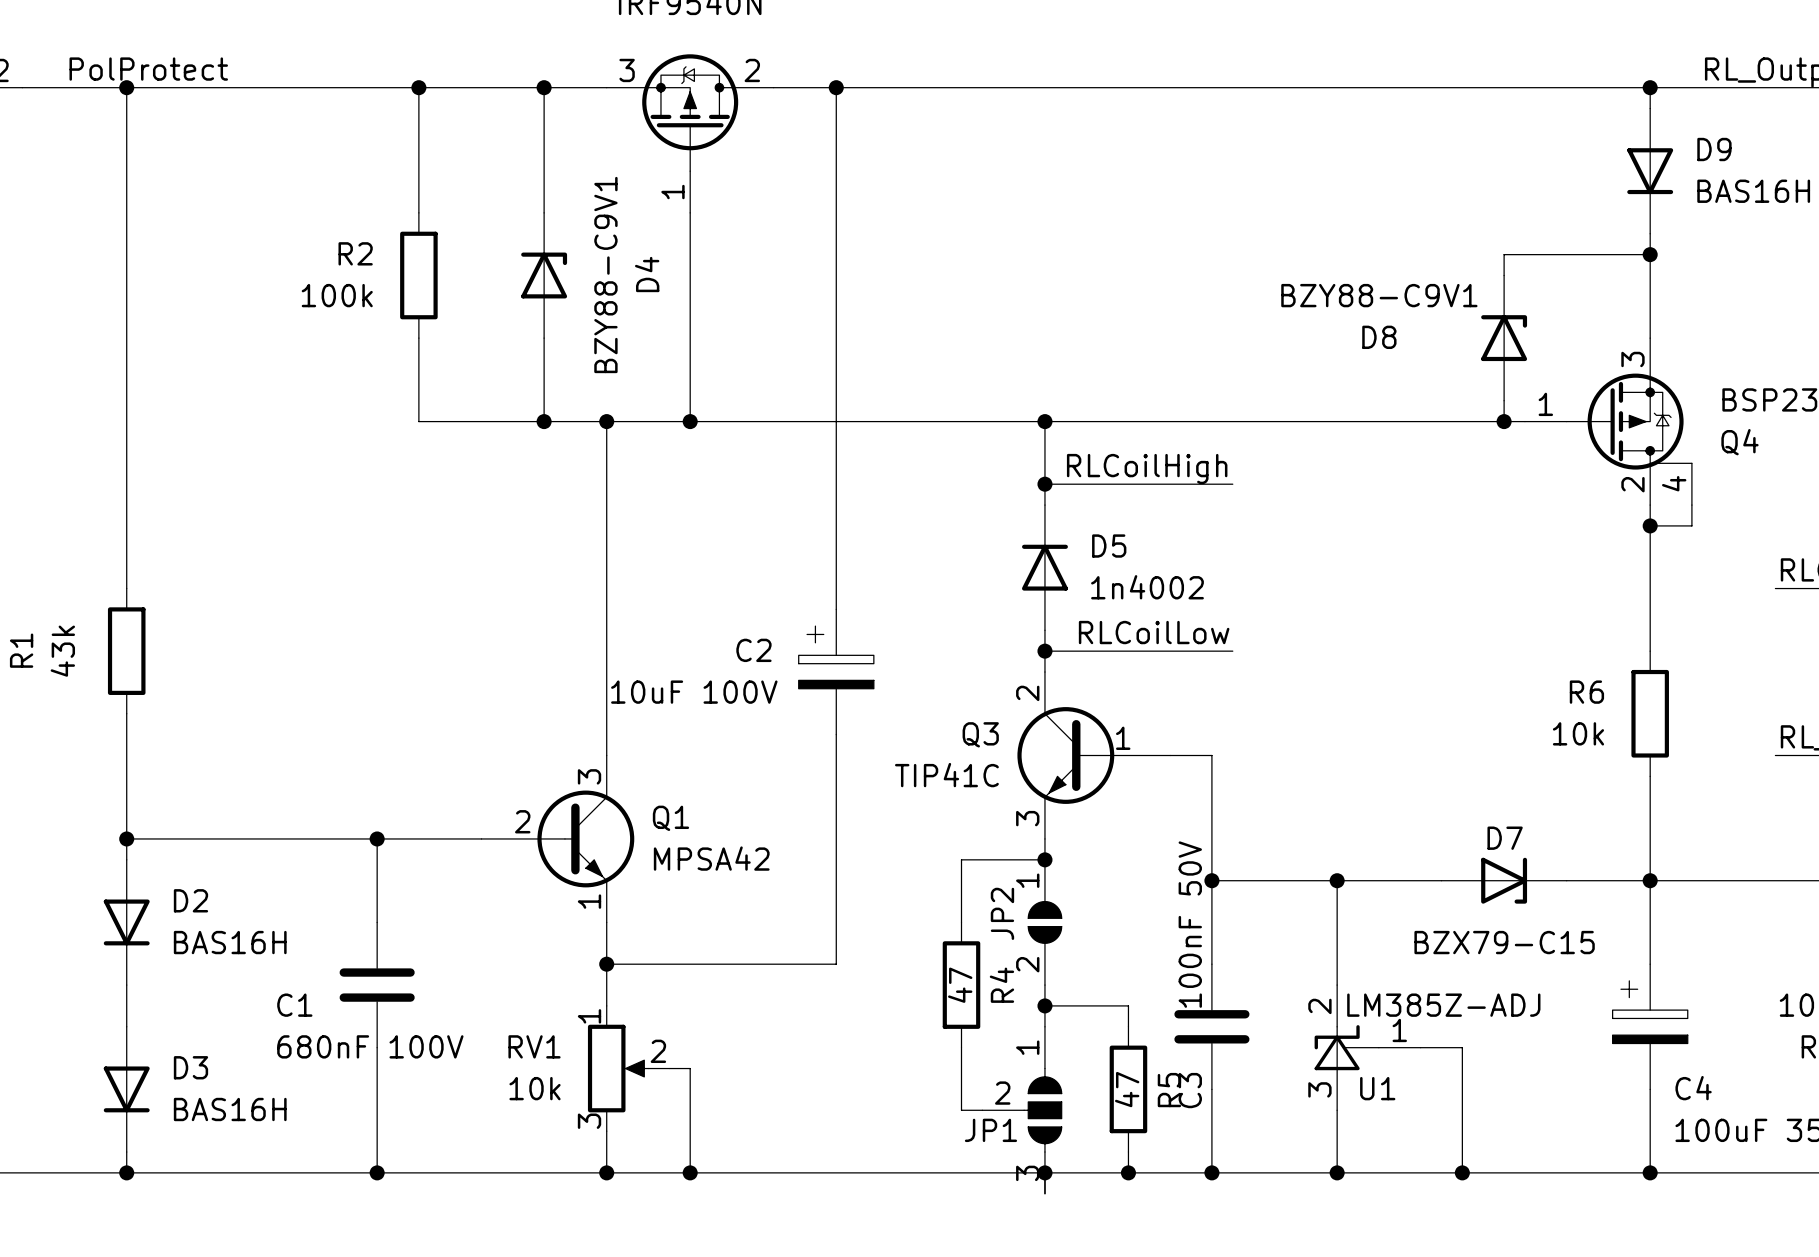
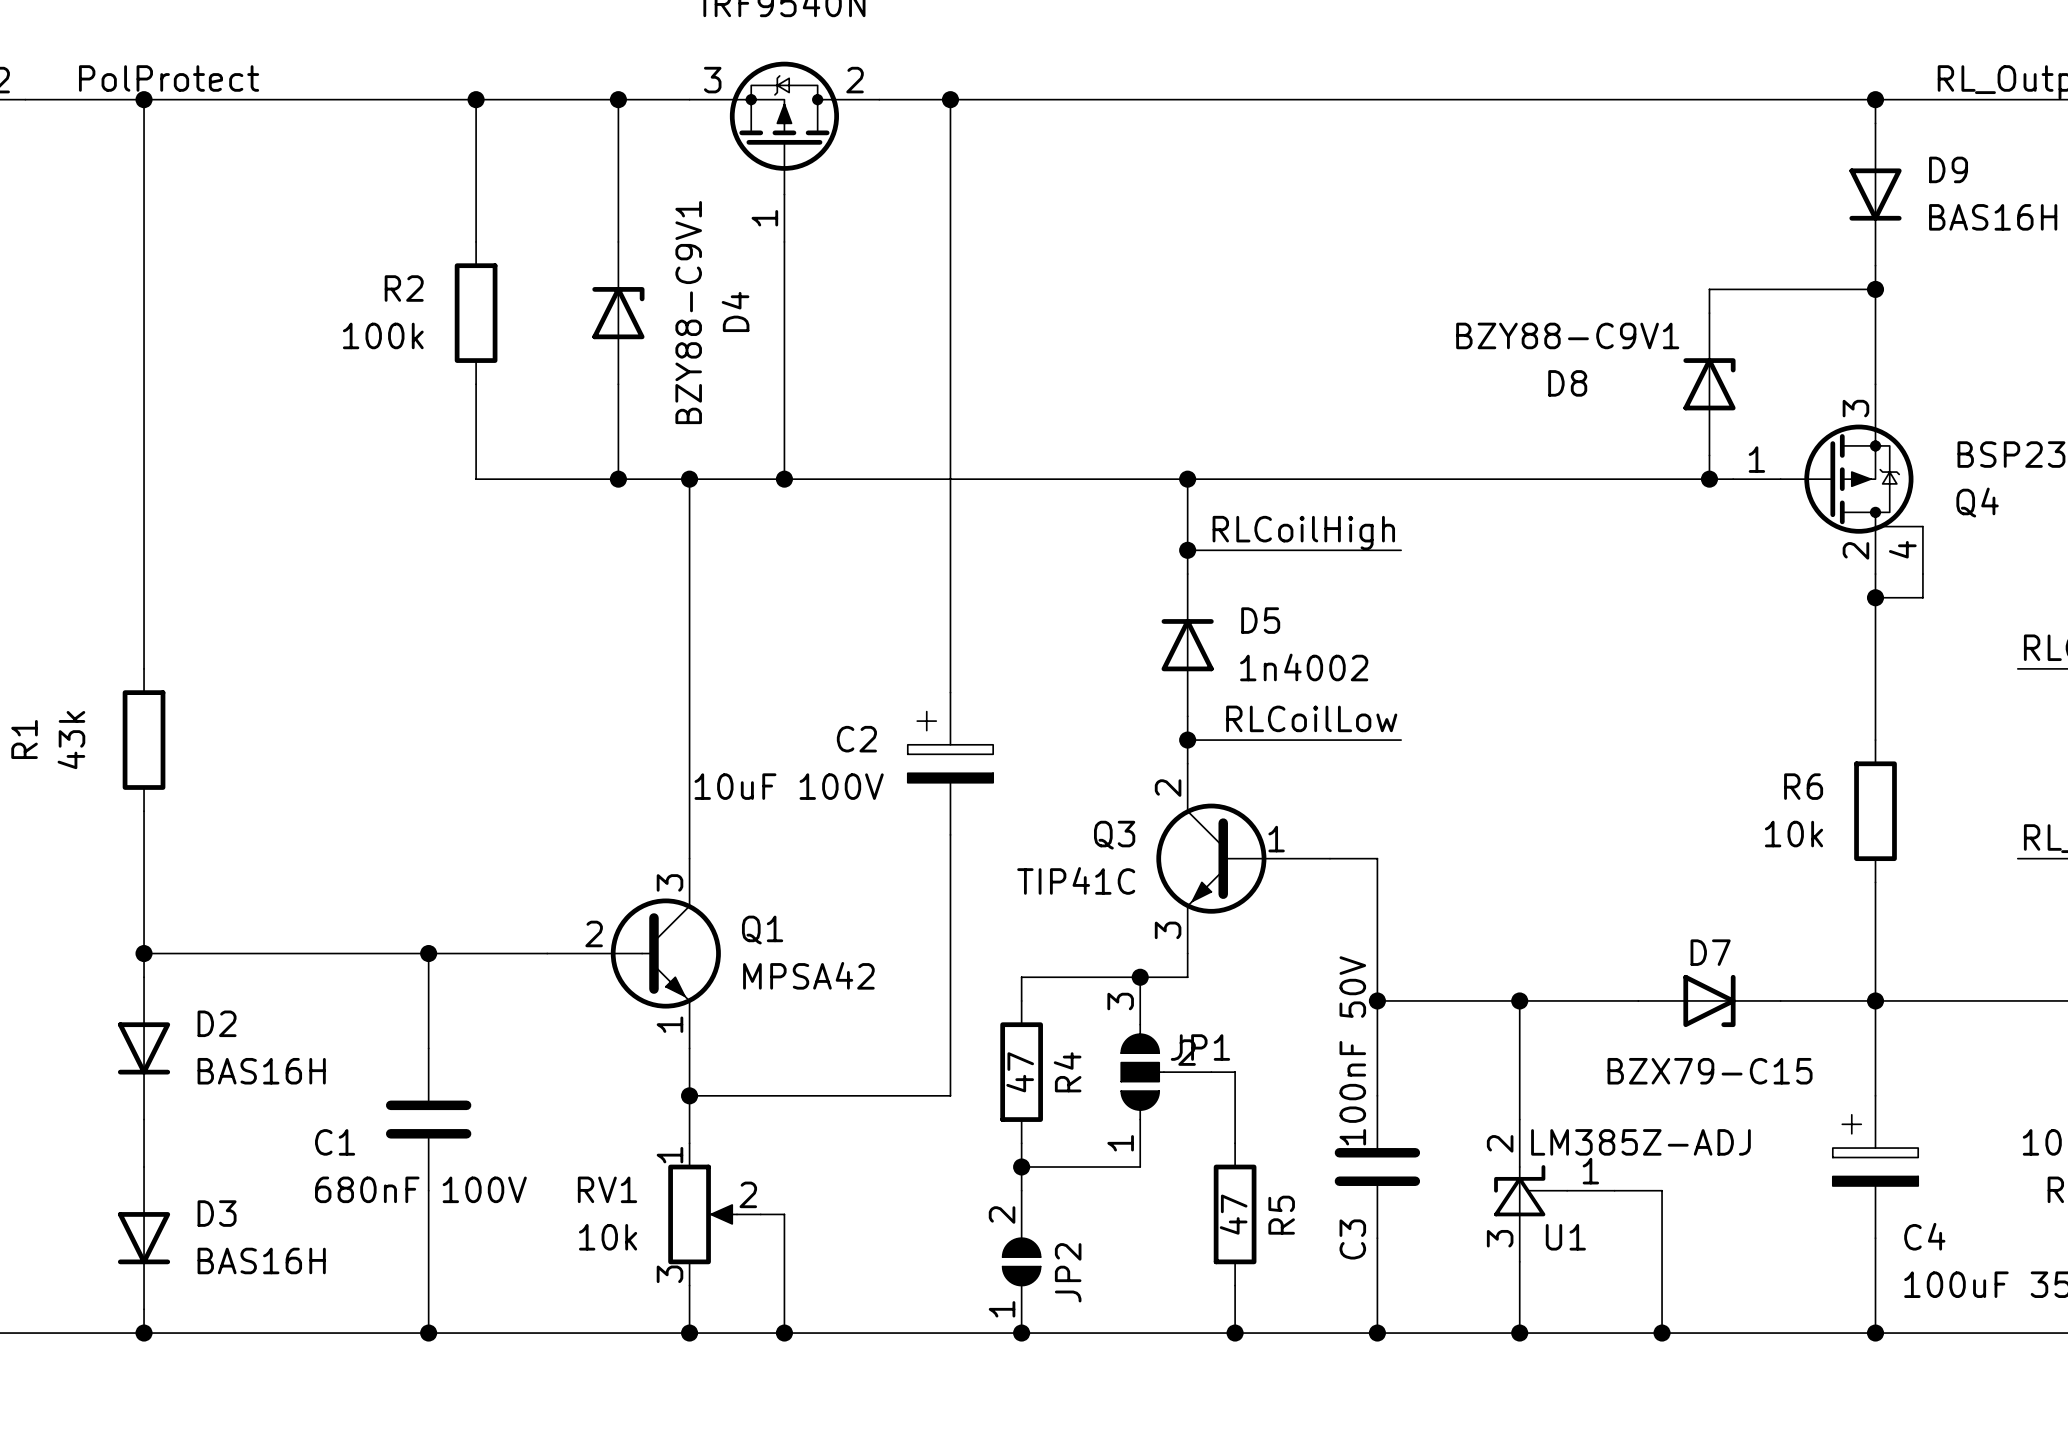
wire: (961, 859) (961, 922) -> (1092, 977) (1021, 977) (1021, 1000)
junction position: (1044, 859) -> (1140, 977)
JP2 rotation: 0° (1044, 922) -> 180° (1021, 1261)
JP2 position: (1044, 922) -> (1021, 1261)
wire: none -> (1211, 1072) (1235, 1072) (1235, 1143)
R4 position: (961, 985) -> (1021, 1072)
wire: (1044, 985) (1044, 1026) -> (1021, 1143) (1021, 1190)
wire: (1044, 1005) (1128, 1005) (1128, 1026) -> none
junction: (1044, 1005) -> none
wire: none -> (1021, 1167) (1140, 1167)
junction: none -> (1021, 1167)
wire: (961, 1047) (961, 1110) (982, 1110) -> none
R5 position: (1128, 1089) -> (1235, 1214)
JP1 position: (1022, 1110) -> (1166, 1072)
JP1 rotation: 0° (1042, 1110) -> 180° (1142, 1072)
wire: none -> (1235, 1285) (1235, 1333)
wire: (1128, 1152) (1128, 1172) -> none
junction: none -> (1021, 1333)
wire: (1044, 1172) (1044, 1193) -> none
junction: (1044, 1172) -> none
junction: none -> (1235, 1333)
junction: (1128, 1172) -> none

